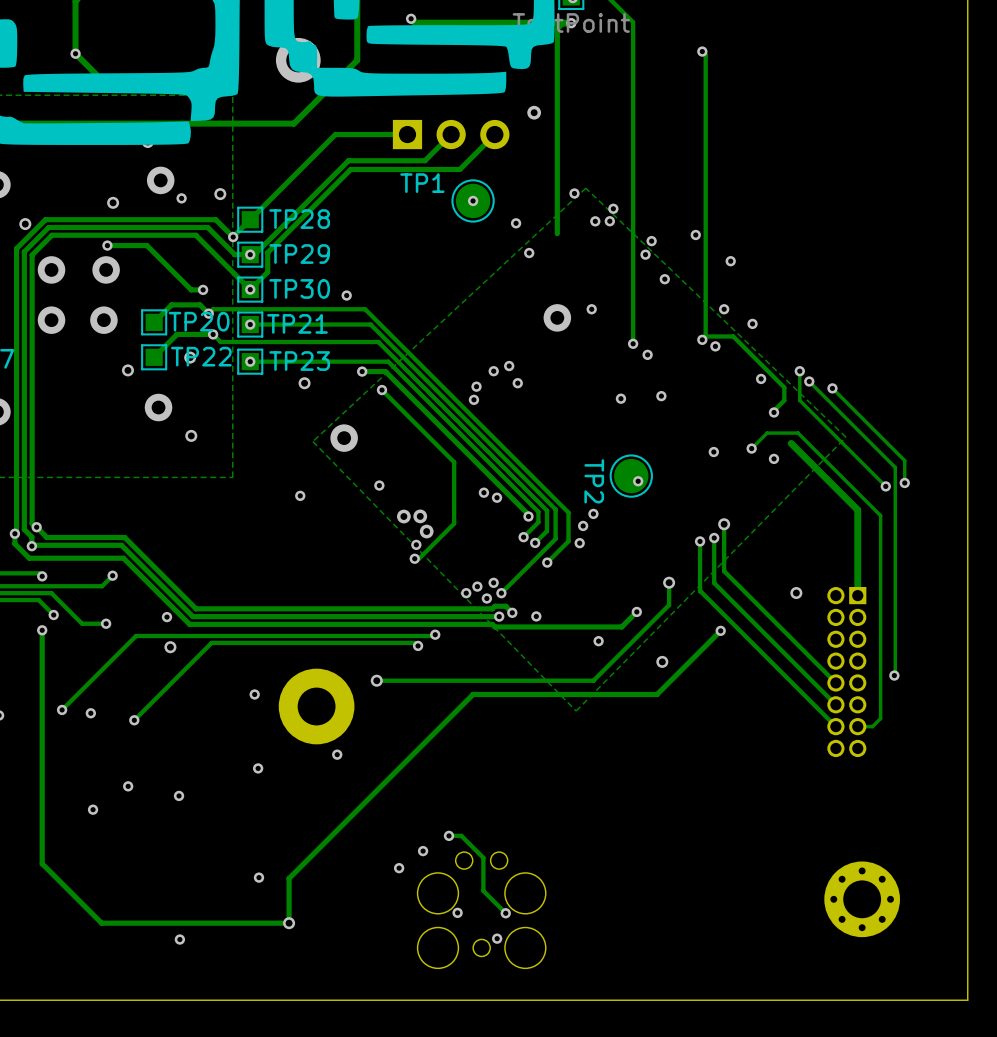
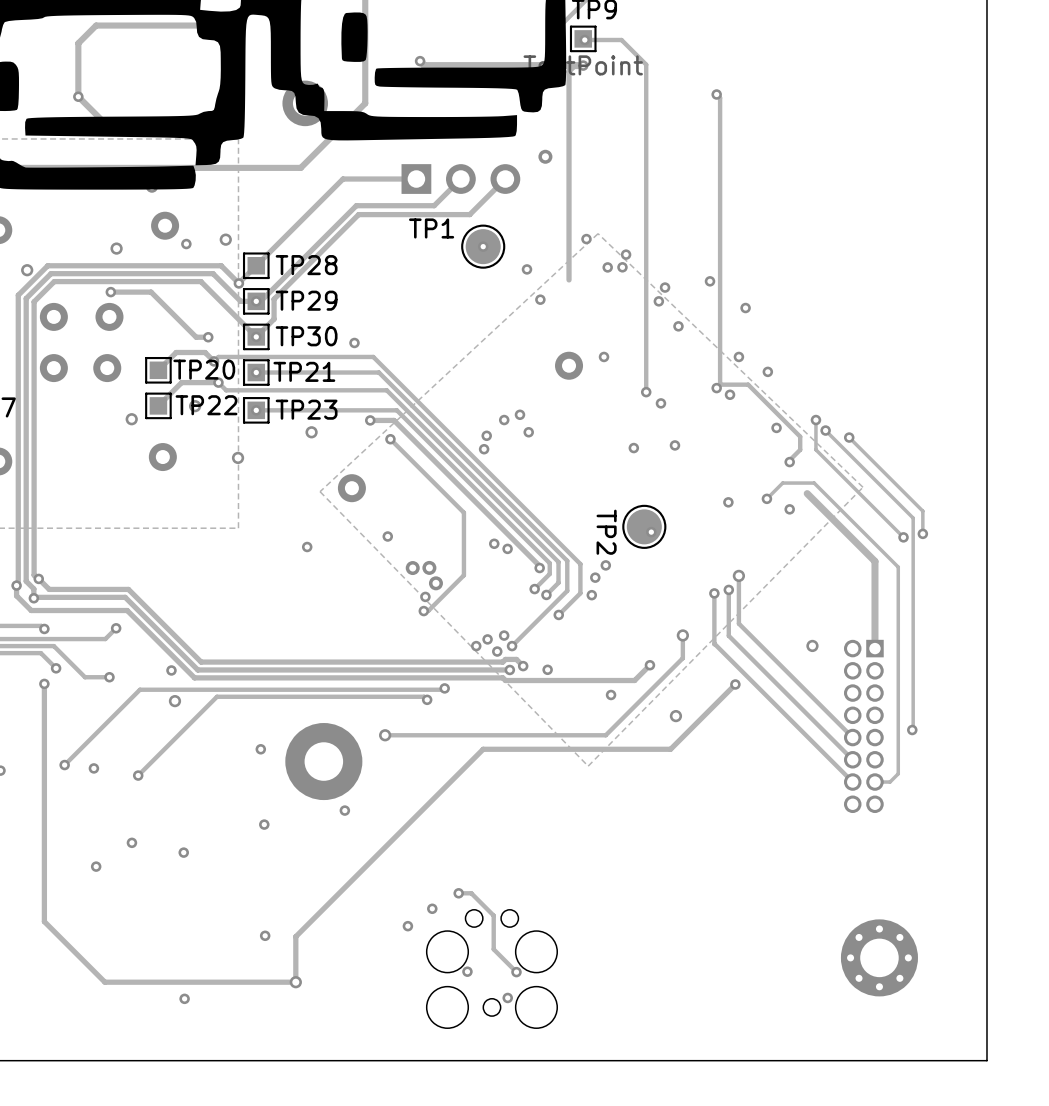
via position: (191, 435) -> (238, 457)

